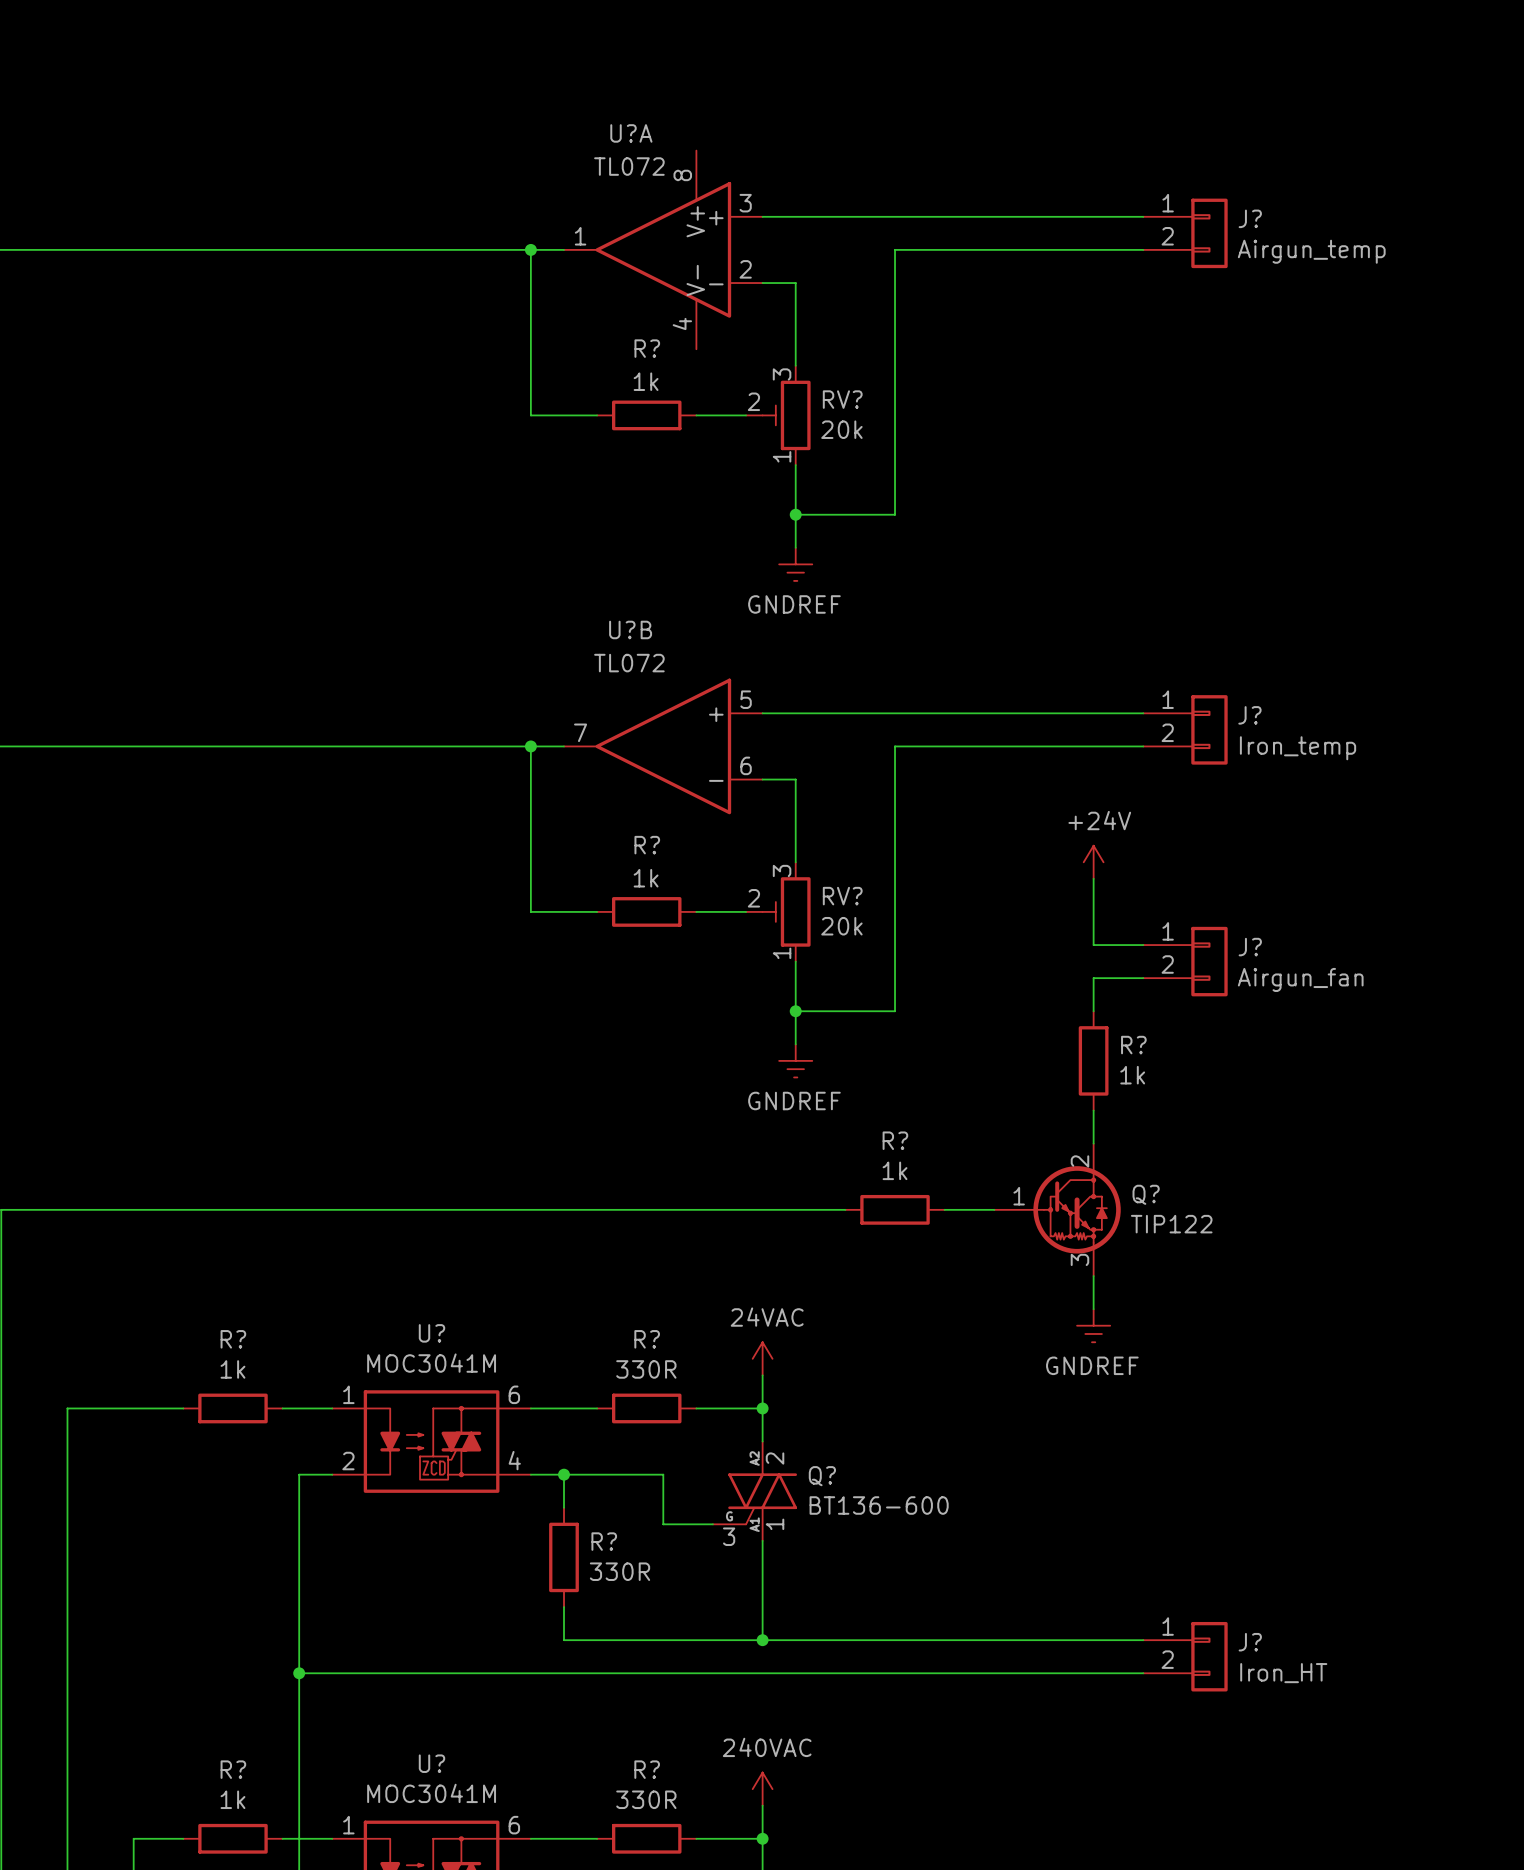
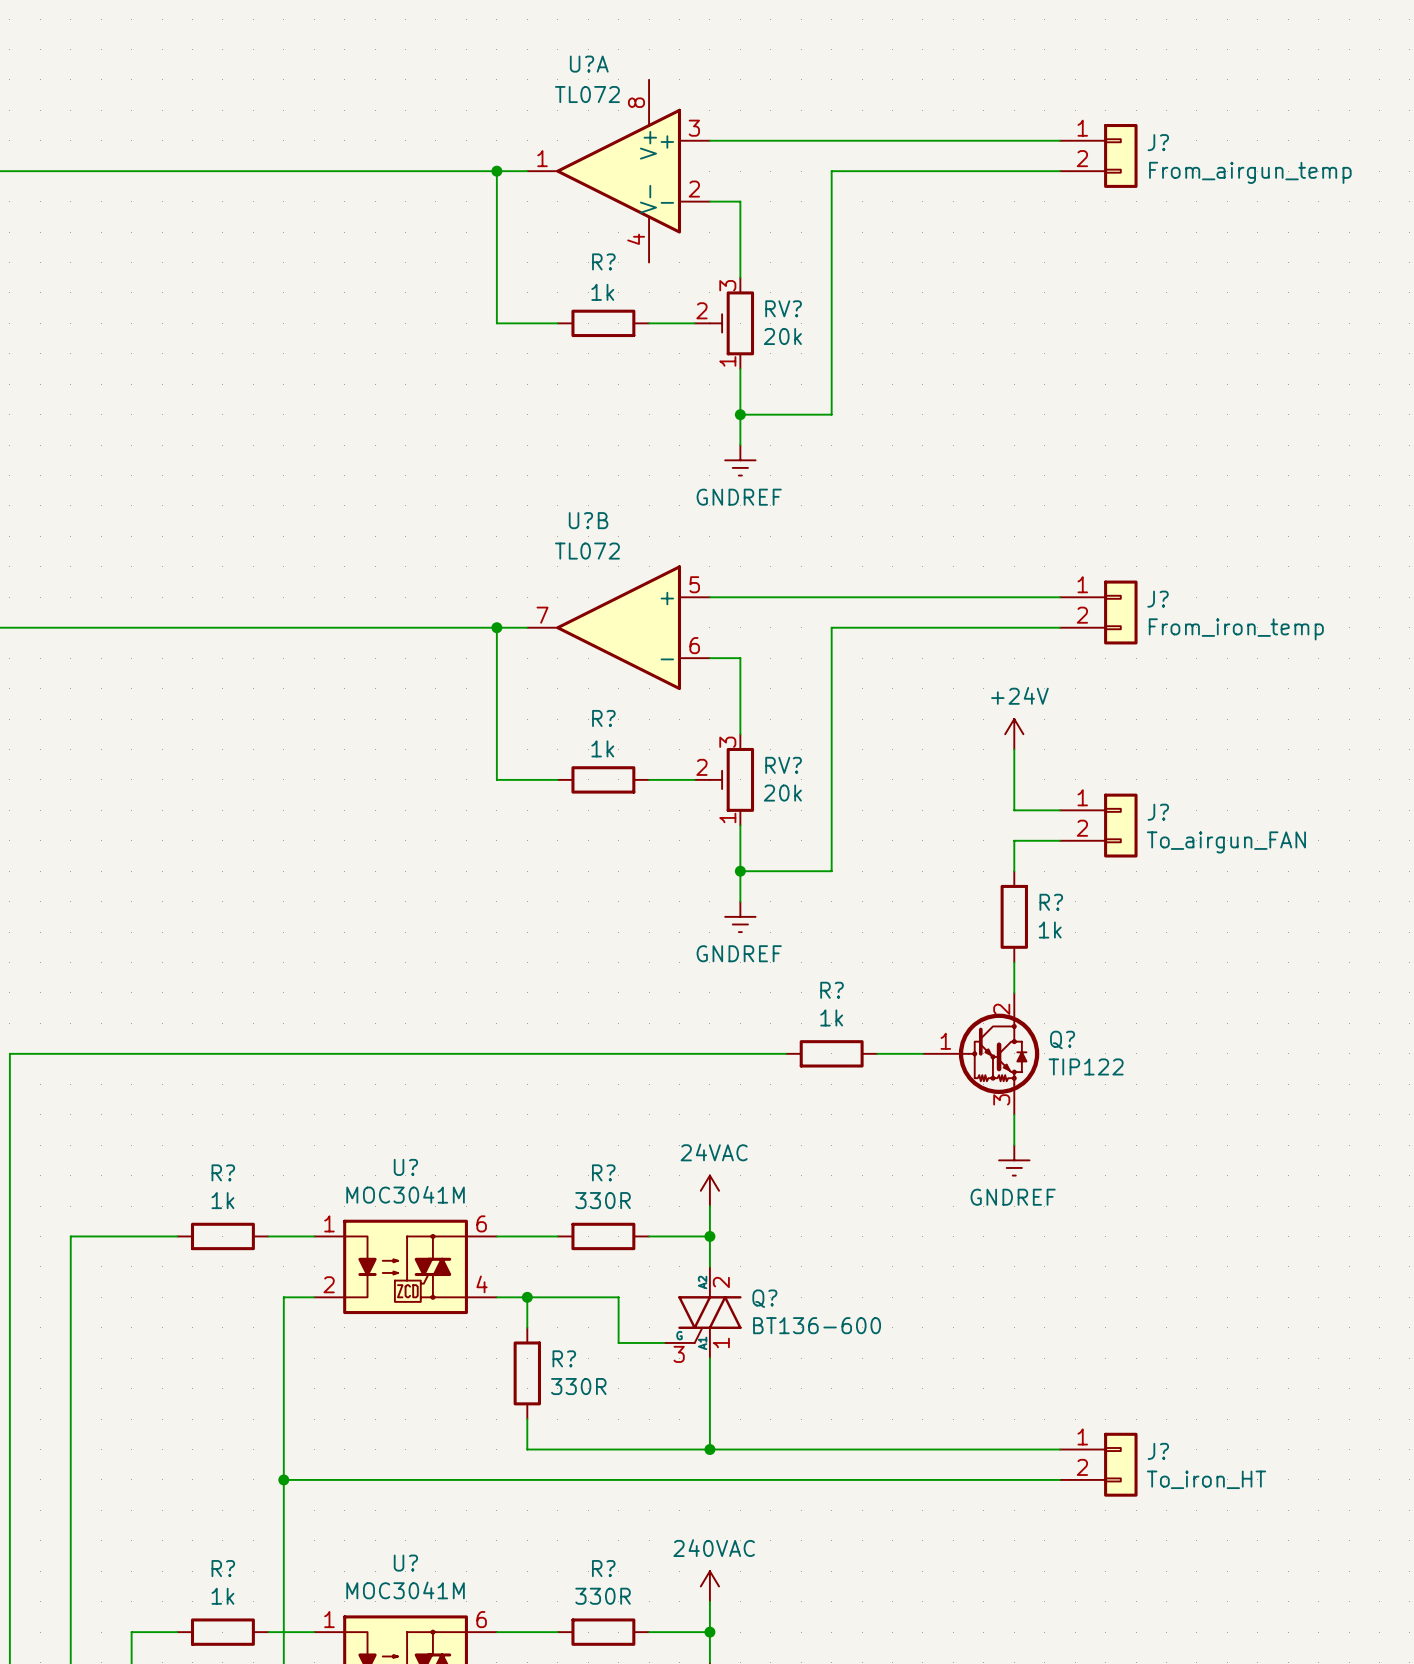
J? value: Airgun_temp (1311, 251) -> From_airgun_temp (1250, 172)
J? value: Iron_temp (1298, 748) -> From_iron_temp (1236, 629)
J? value: Airgun_fan (1300, 979) -> To_airgun_FAN (1226, 842)
J? value: Iron_HT (1283, 1673) -> To_iron_HT (1206, 1479)

